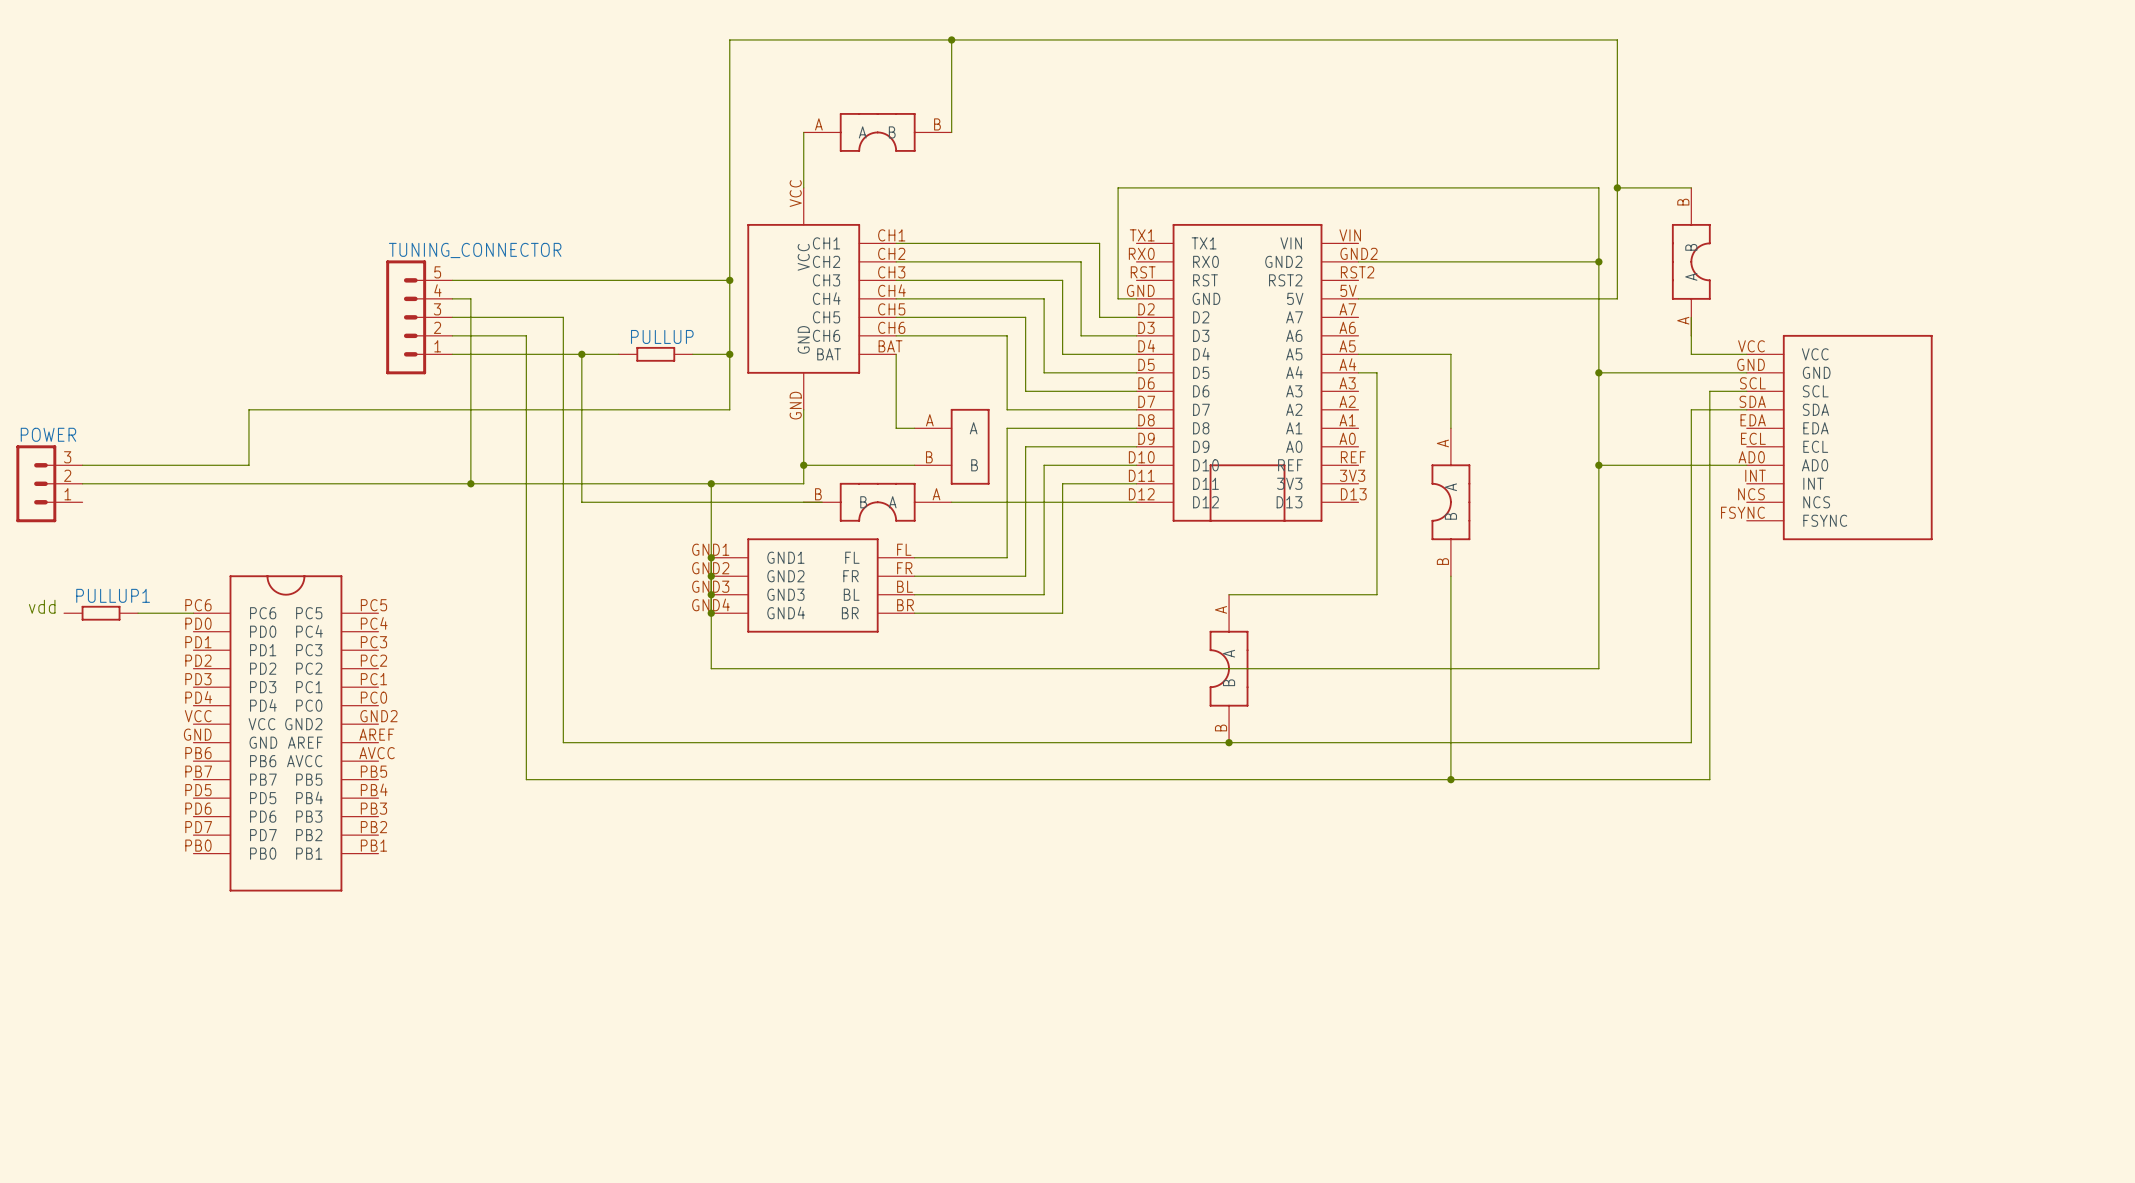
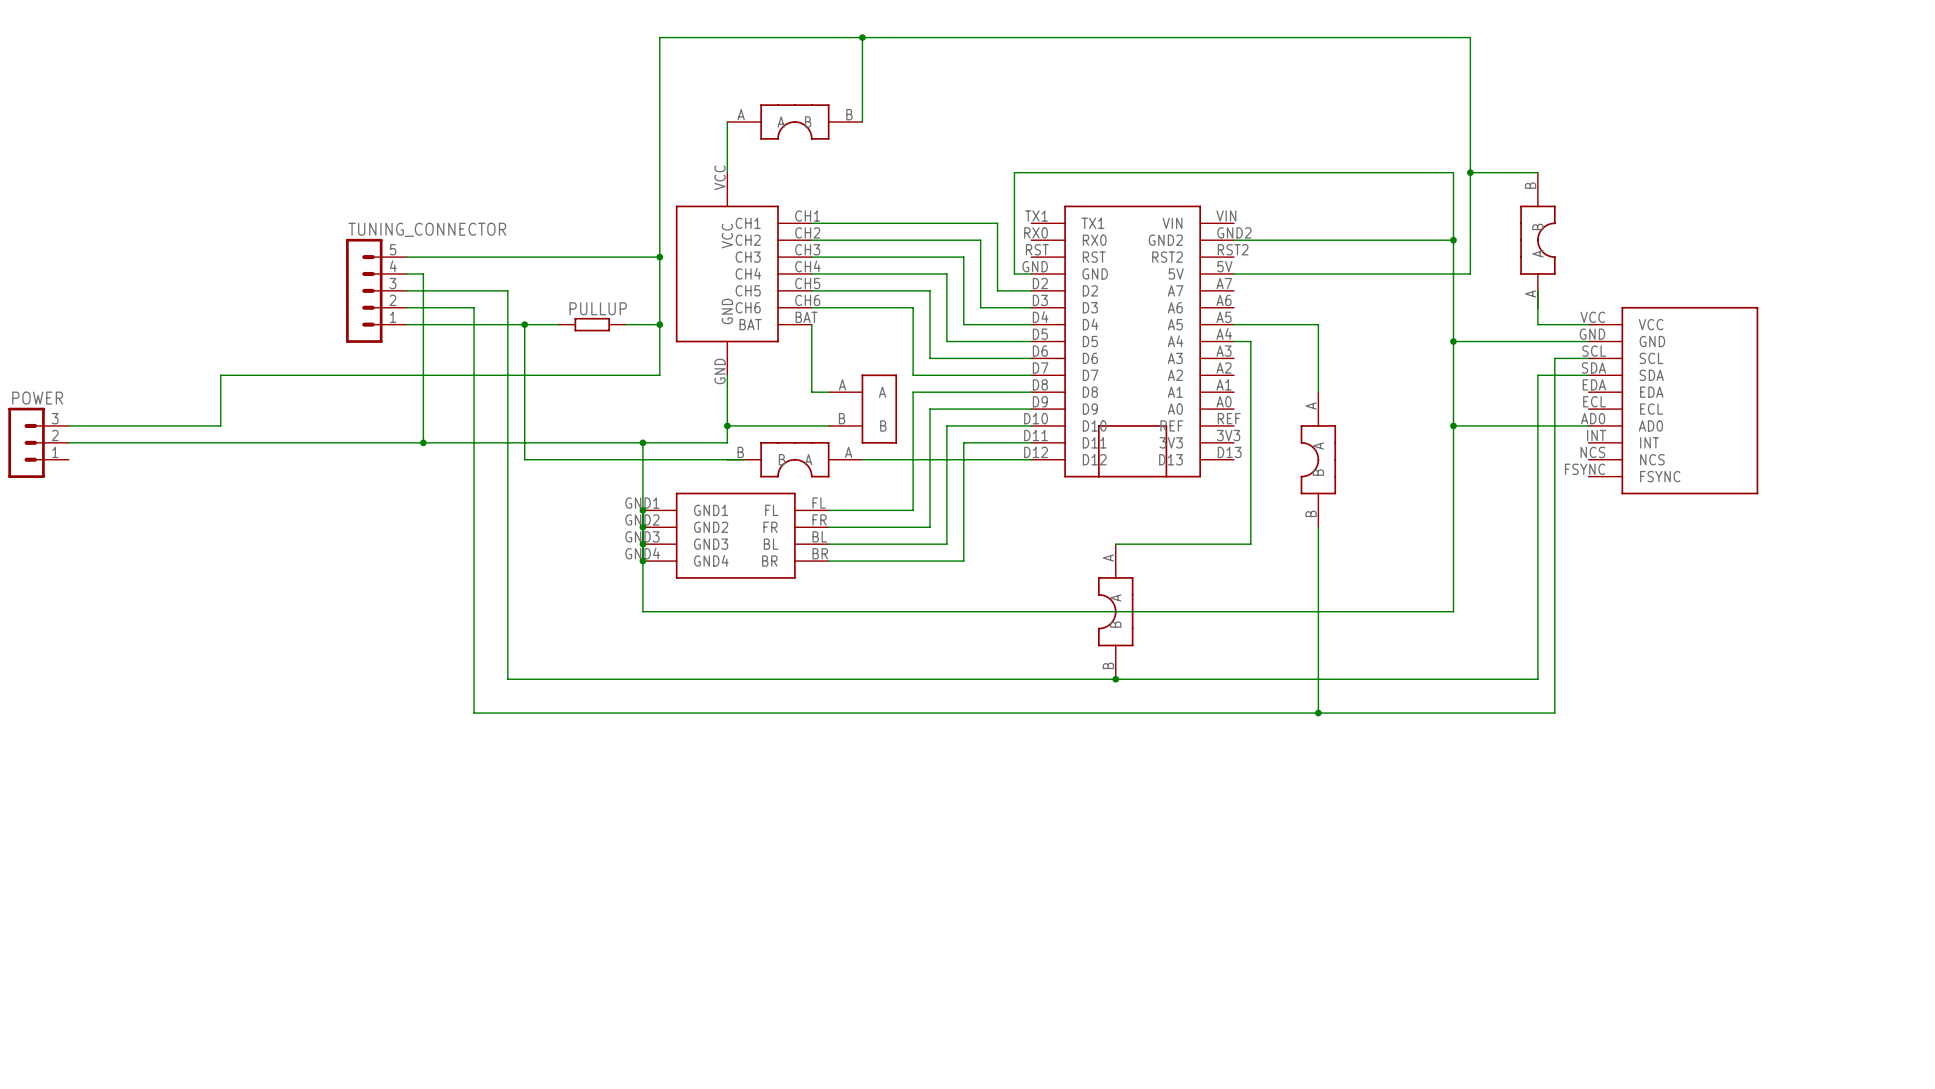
text: vdd (42, 606) -> none
PULLUP1: (101, 613) -> none
wire: (138, 613) (193, 613) -> none
part: (285, 733) -> none

